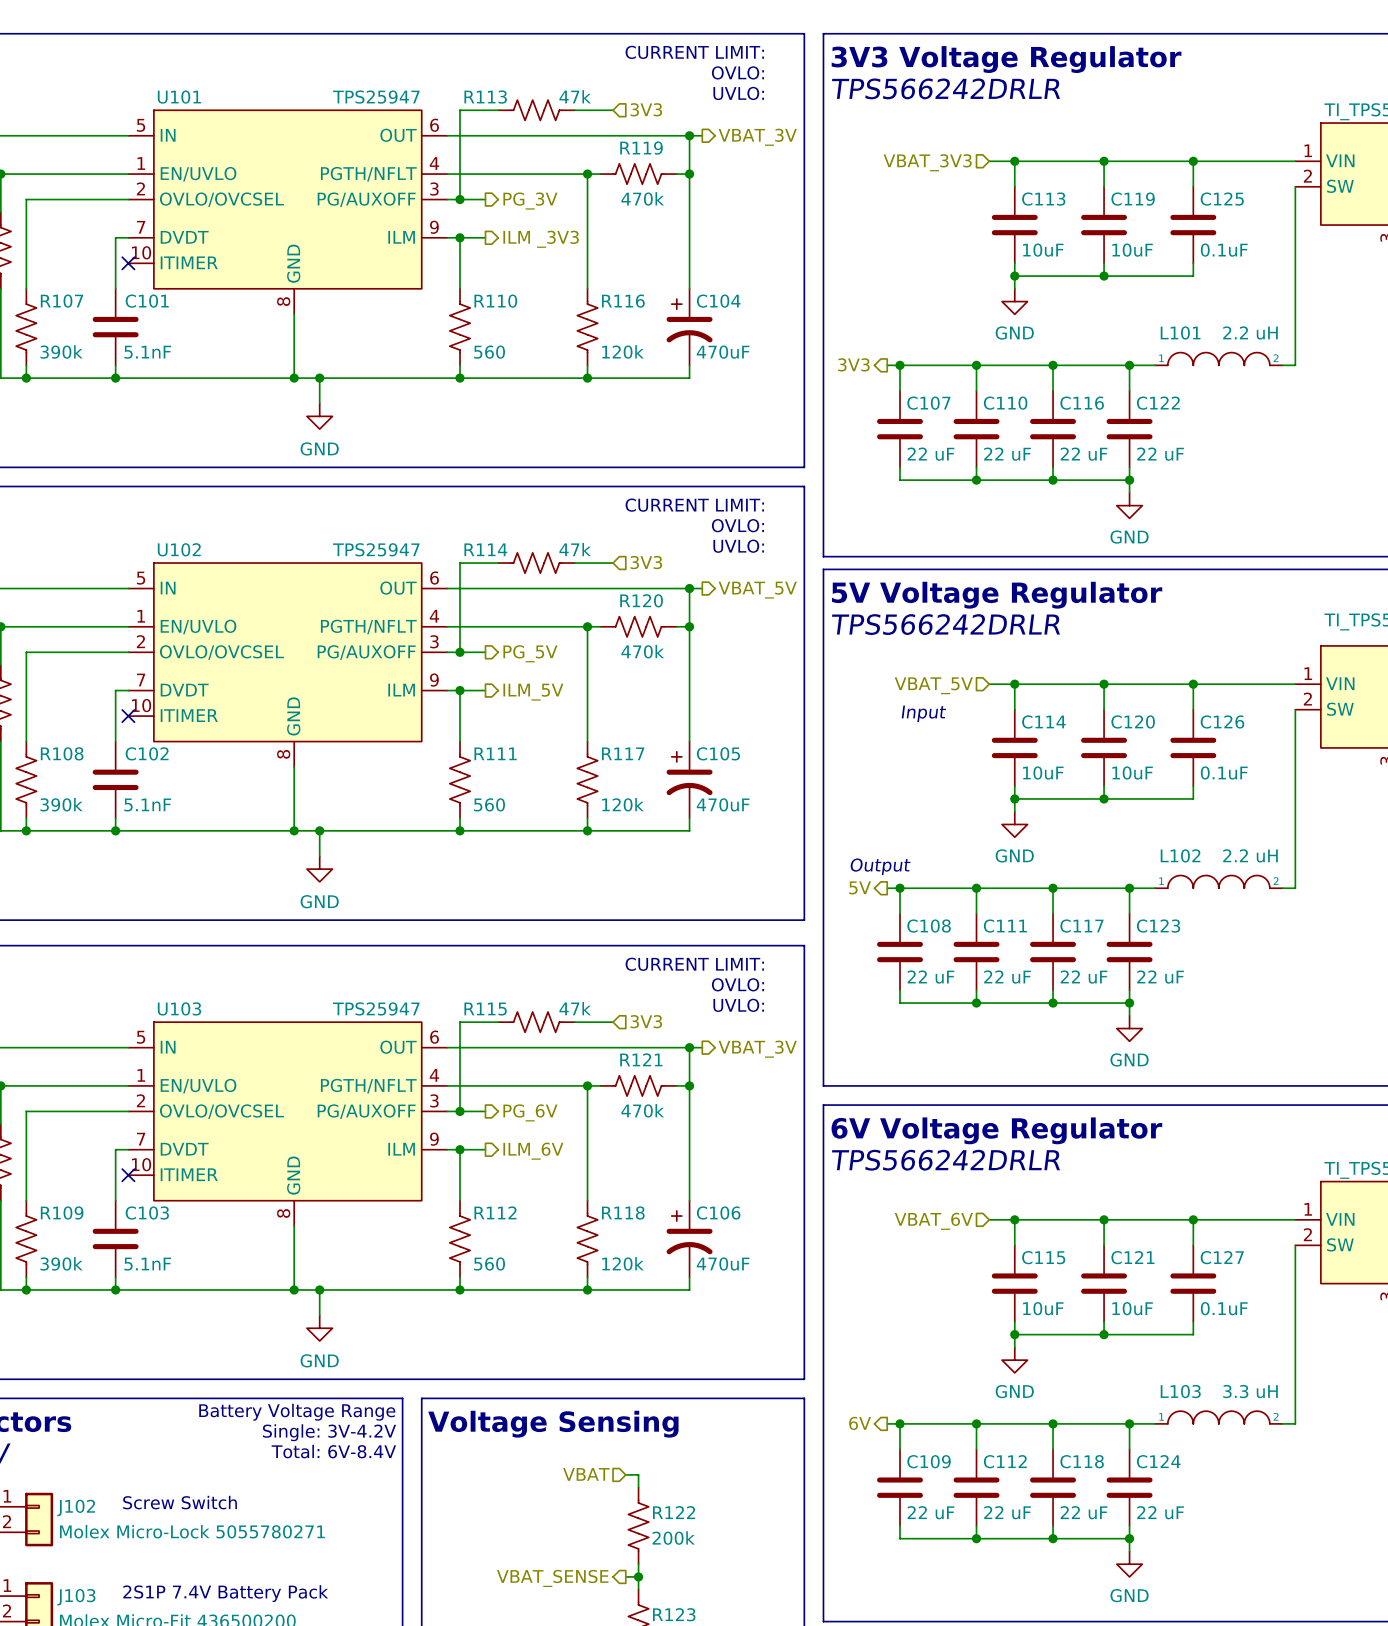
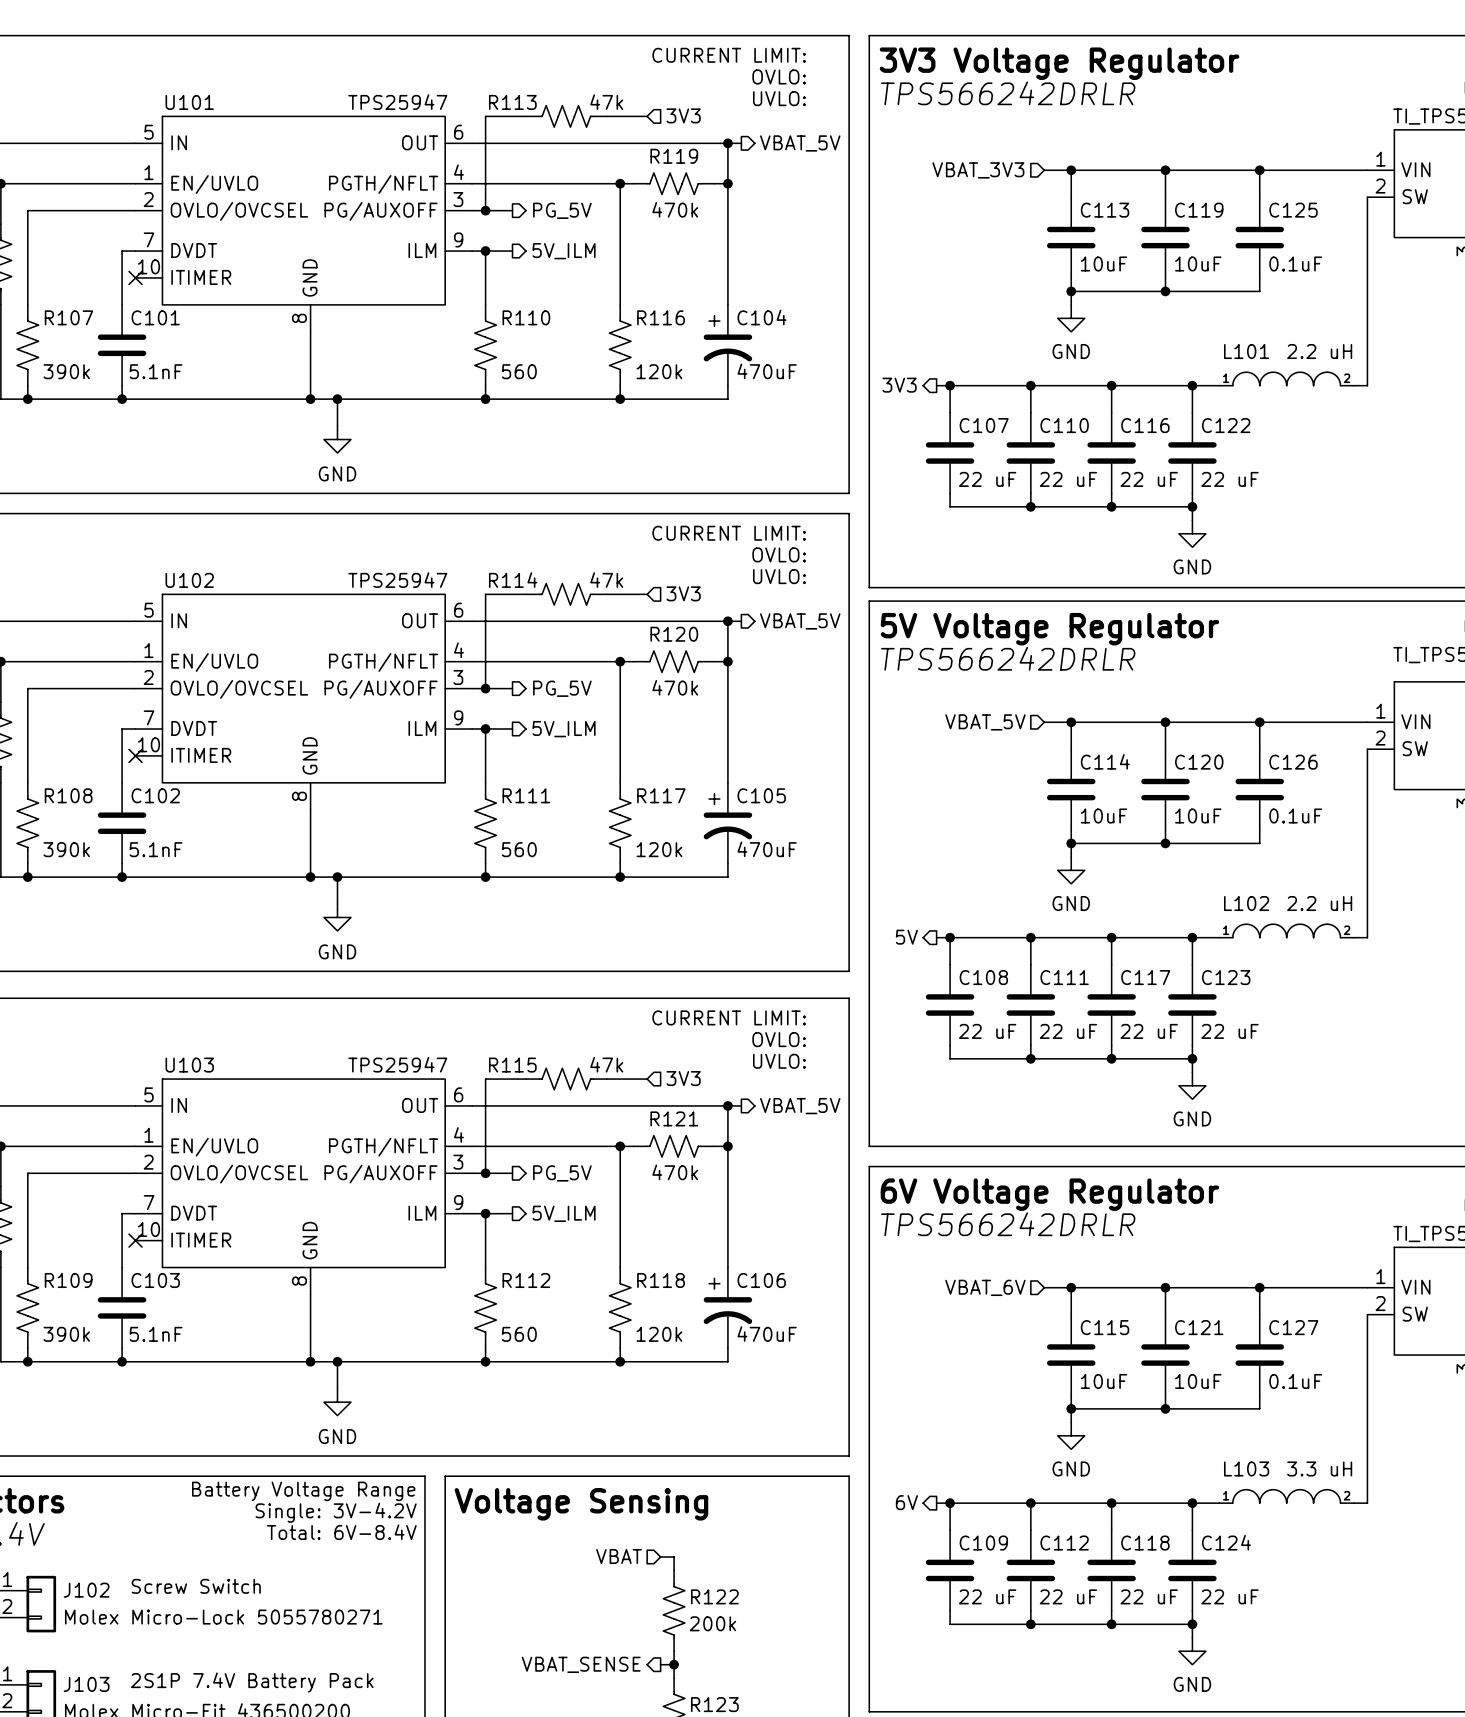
hierarchical label: VBAT_3V (757, 137) -> VBAT_5V (800, 143)
hierarchical label: PG_3V (530, 201) -> PG_5V (562, 210)
hierarchical label: ILM _3V3 (541, 239) -> 5V_ILM (564, 251)
hierarchical label: ILM_5V (533, 692) -> 5V_ILM (564, 729)
text: Input (923, 713) -> none
text: Output (880, 866) -> none
hierarchical label: VBAT_3V (757, 1049) -> VBAT_5V (800, 1106)
hierarchical label: PG_6V (530, 1112) -> PG_5V (562, 1173)
hierarchical label: ILM_6V (533, 1151) -> 5V_ILM (564, 1213)

